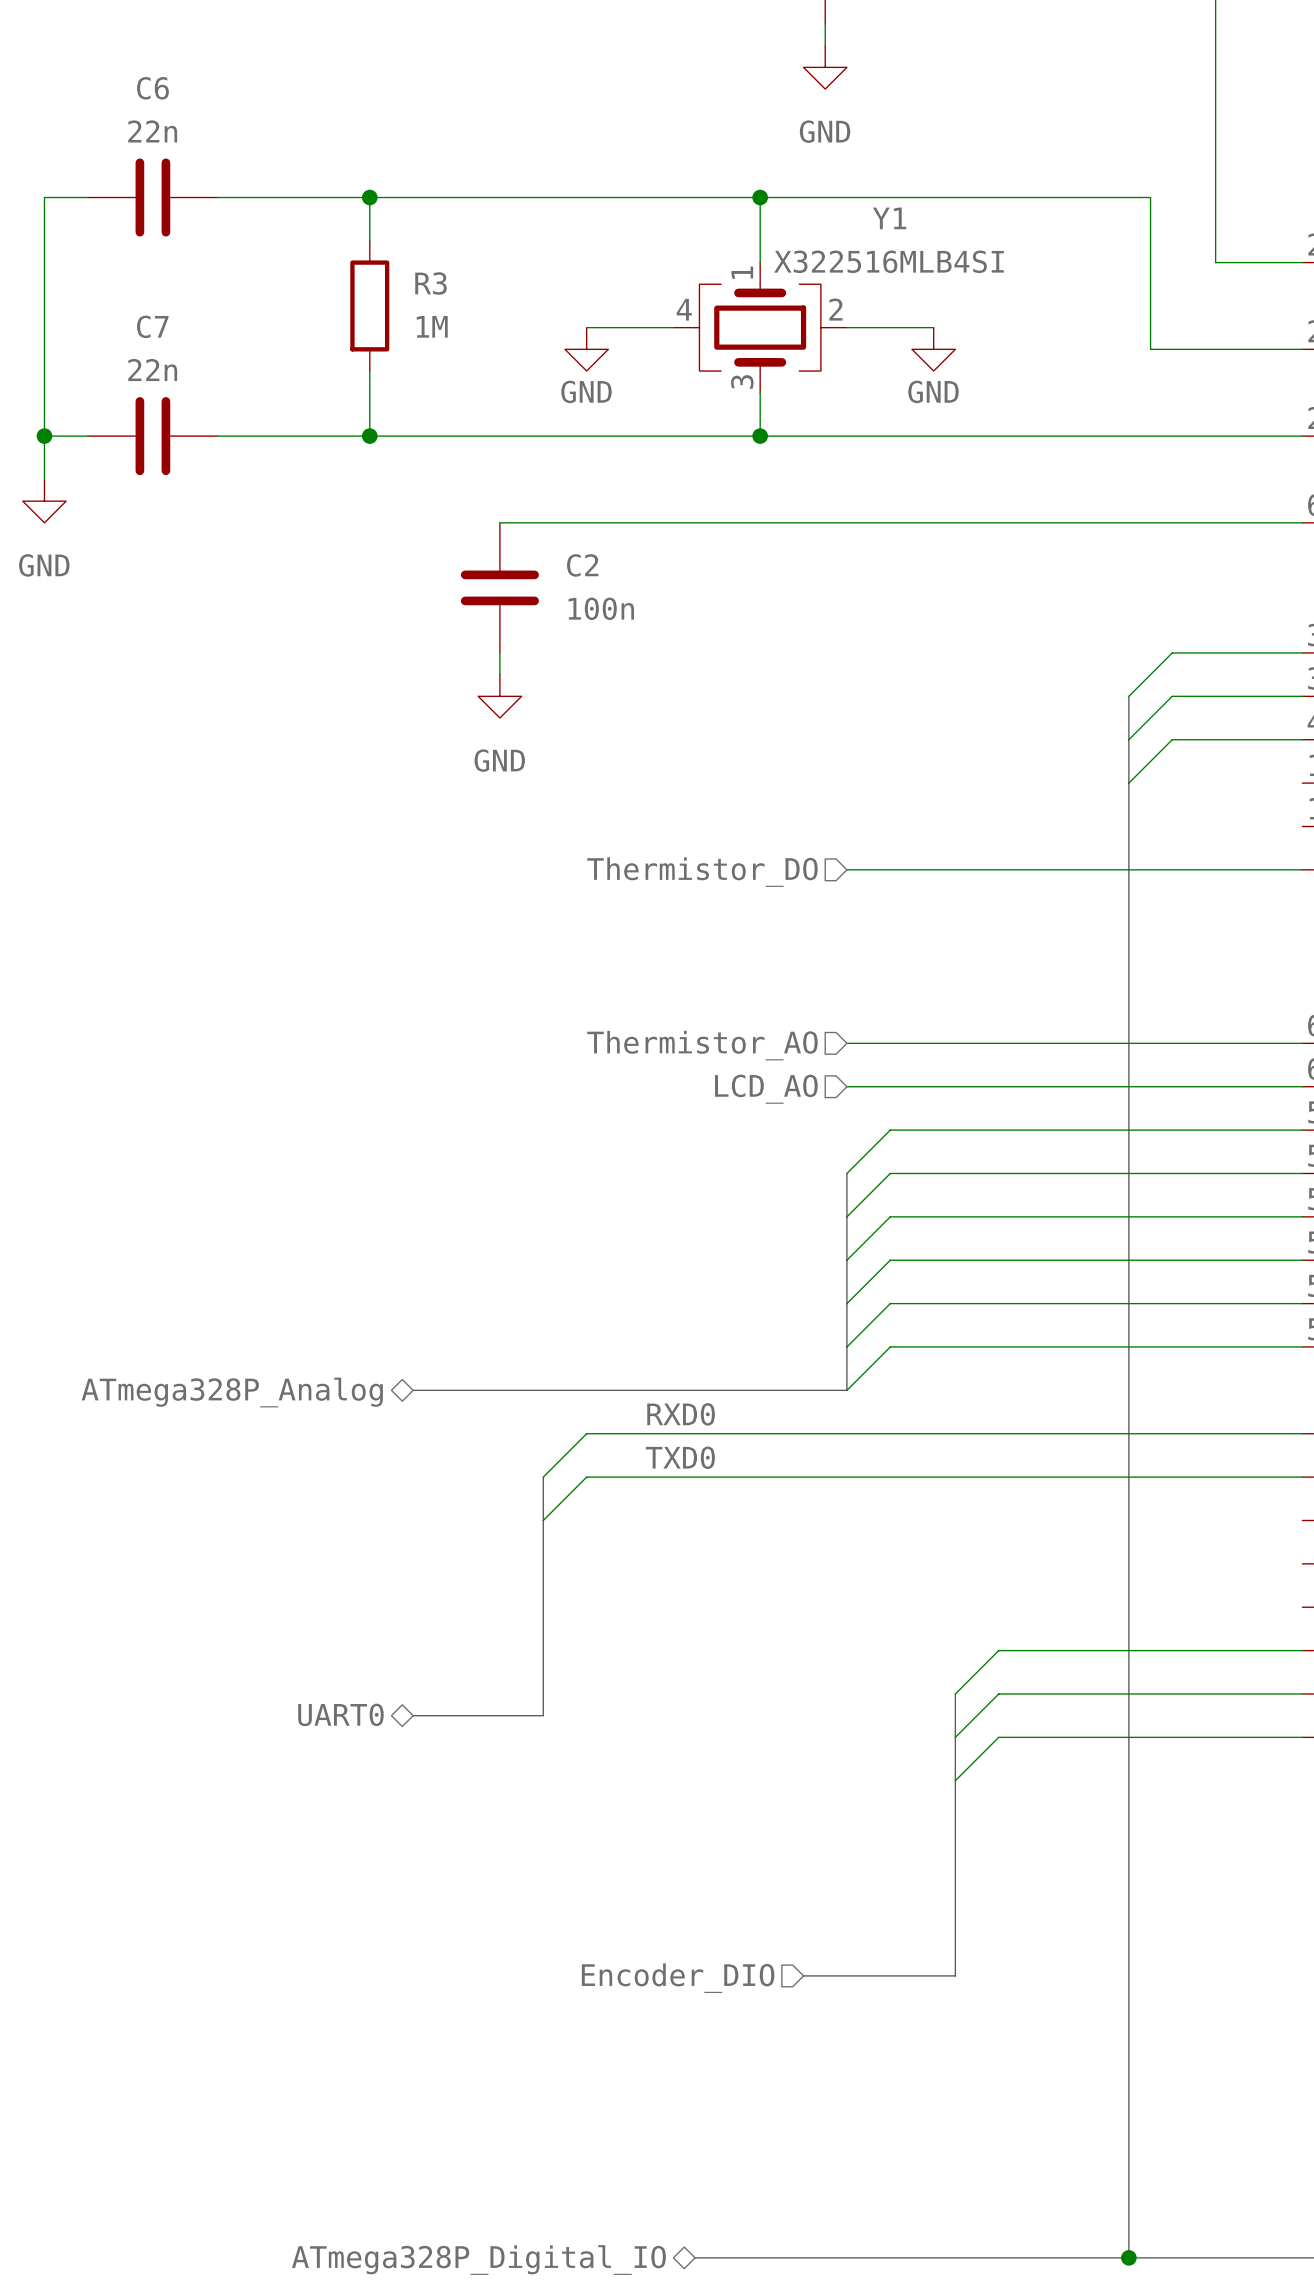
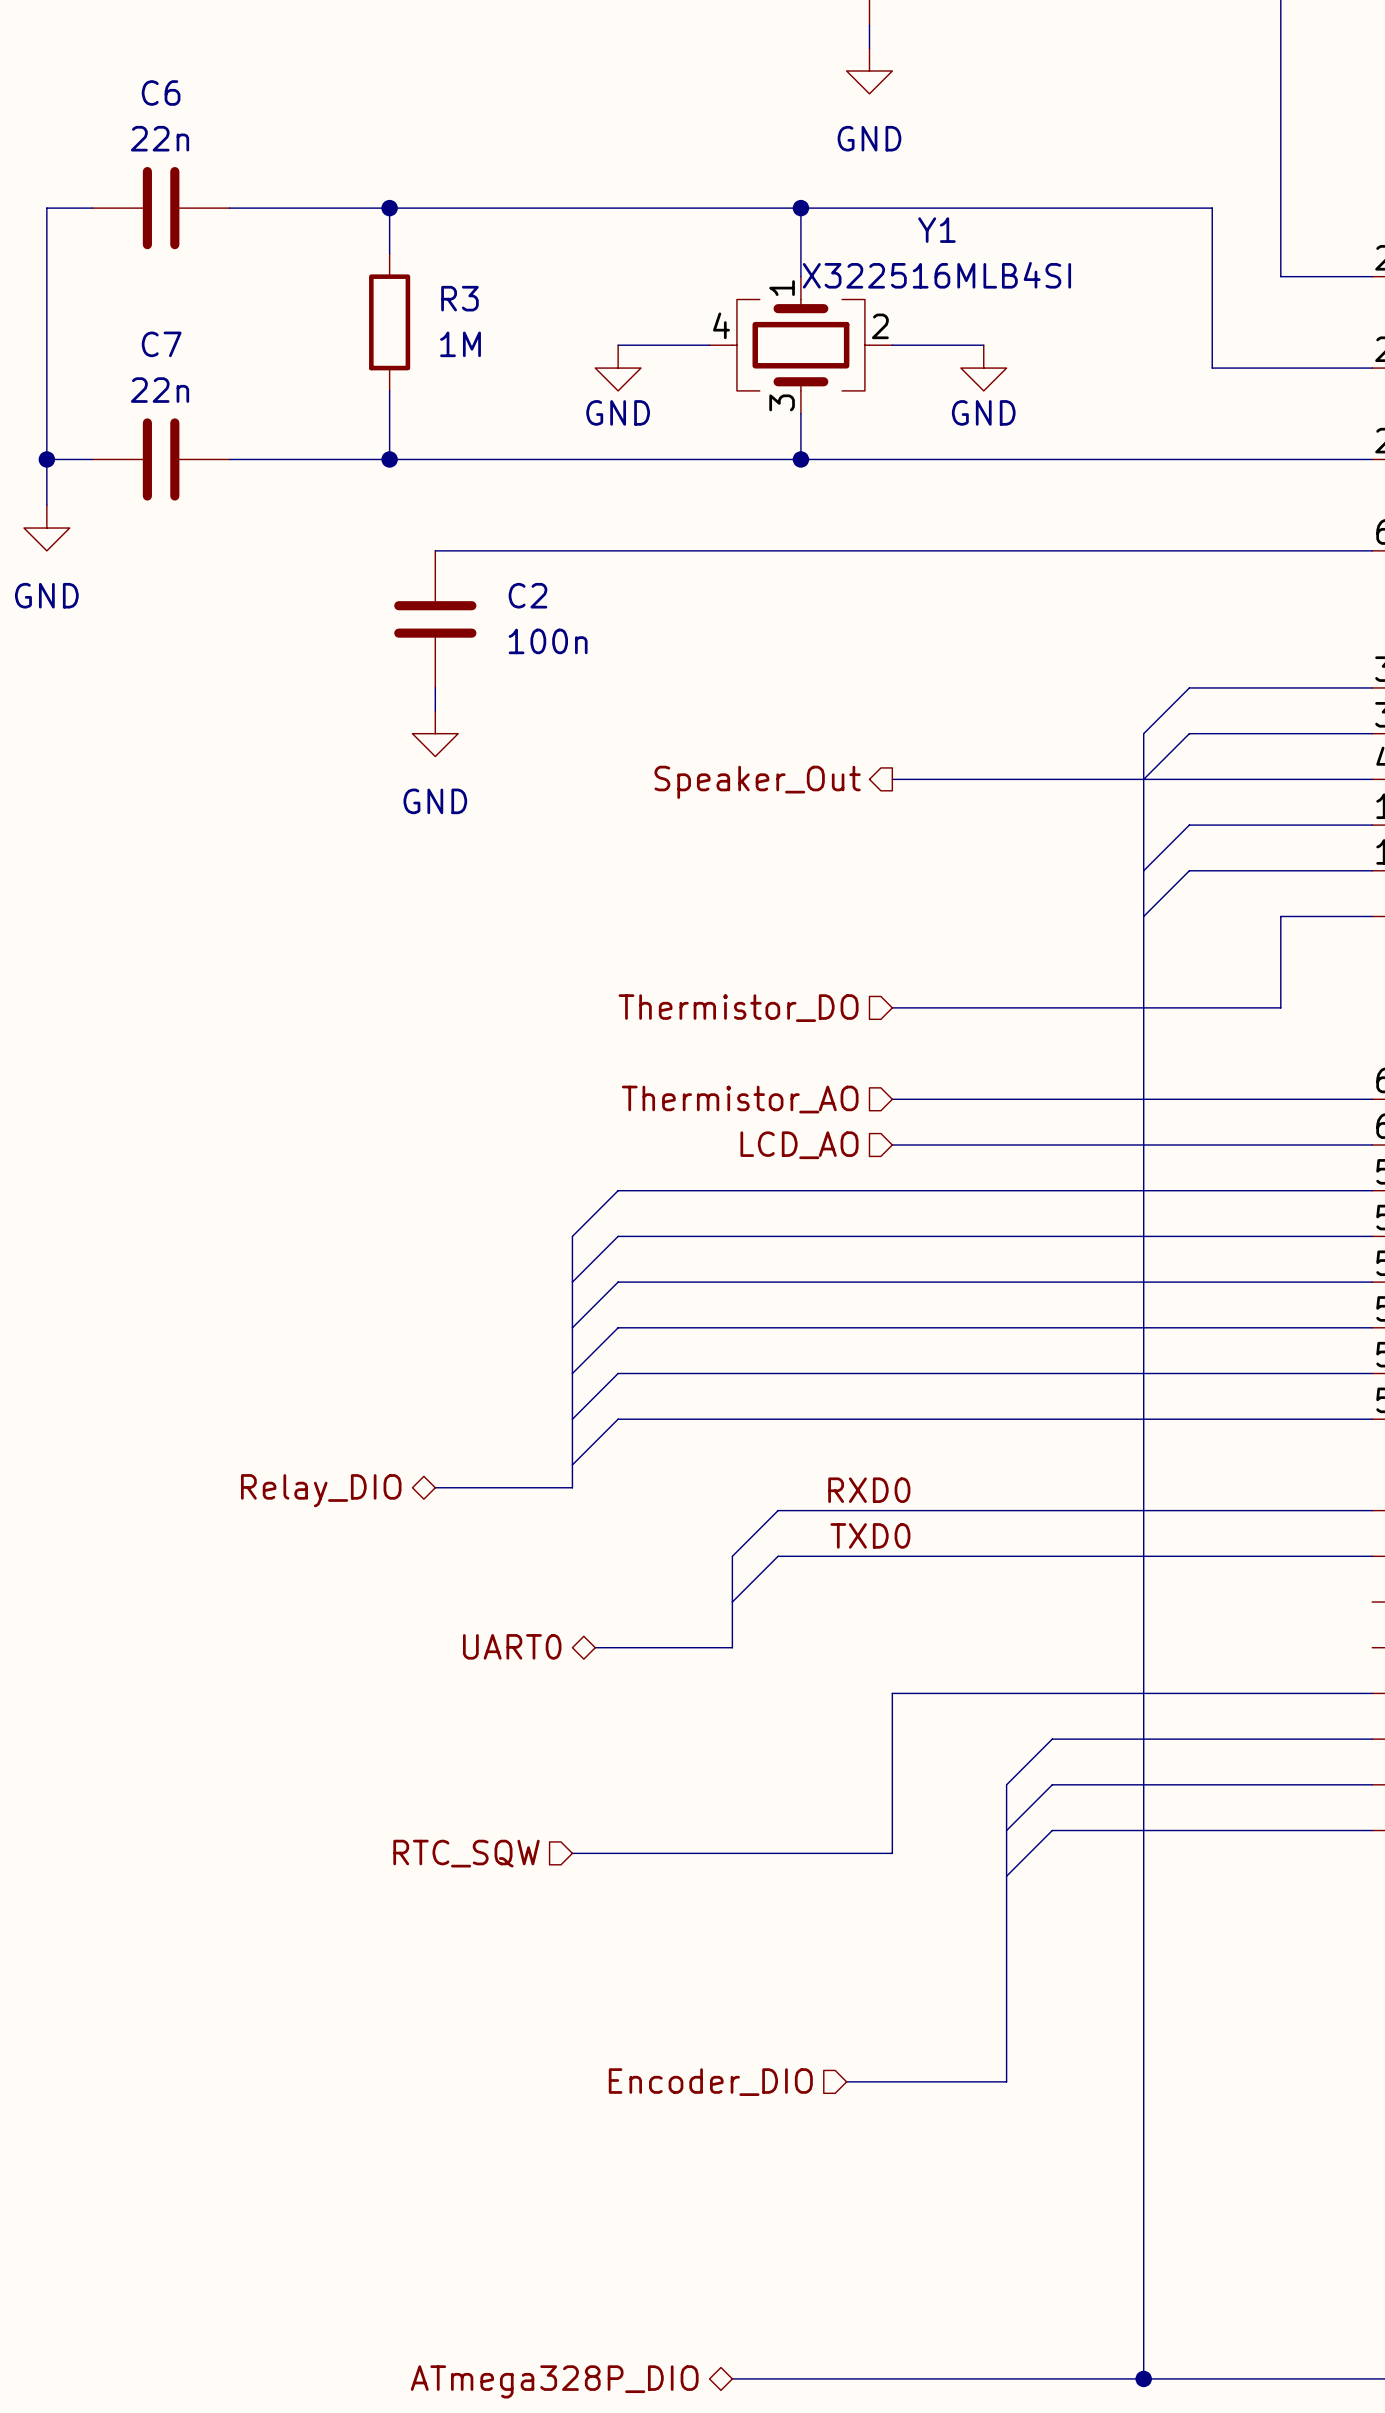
wire: none -> (435, 550) (526, 550)
C2 position: (499, 587) -> (435, 619)
wire: (499, 652) (499, 674) -> (435, 687) (435, 710)
wire: (1172, 652) (1128, 696) -> (1235, 687) (1189, 687) (1143, 733)
power symbol position: GND (499, 696) -> GND (435, 733)
bus: (1128, 696) (1128, 2257) -> (1143, 733) (1143, 2378)
wire: (1172, 696) (1128, 739) -> (1235, 733) (1189, 733) (1143, 779)
wire: (1172, 739) (1128, 783) -> (1235, 779) (892, 779)
hierarchical label: none -> Speaker_Out (757, 782)
wire: none -> (1372, 825) (1189, 825) (1143, 870)
wire: none -> (1372, 870) (1189, 870) (1143, 916)
wire: (846, 869) (1215, 869) -> (892, 1007) (1280, 1007) (1280, 916)
hierarchical label position: Thermistor_DO (702, 872) -> Thermistor_DO (738, 1008)
wire: (890, 1130) (846, 1173) -> (938, 1190) (618, 1190) (572, 1236)
bus: (846, 1173) (846, 1390) (413, 1390) -> none
wire: (890, 1173) (846, 1216) -> (938, 1236) (618, 1236) (572, 1282)
wire: (890, 1216) (846, 1260) -> (938, 1282) (618, 1282) (572, 1327)
wire: (890, 1260) (846, 1303) -> (938, 1327) (618, 1327) (572, 1373)
wire: (890, 1303) (846, 1346) -> (938, 1373) (618, 1373) (572, 1419)
wire: (890, 1346) (846, 1390) -> (938, 1419) (618, 1419) (572, 1464)
hierarchical label: ATmega328P_Analog (232, 1392) -> none
hierarchical label: none -> Relay_DIO (321, 1490)
label position: RXD0 (681, 1414) -> RXD0 (869, 1490)
wire: (738, 1433) (586, 1433) (543, 1477) -> (778, 1510) (732, 1556)
label position: TXD0 (680, 1457) -> TXD0 (870, 1535)
bus: (543, 1477) (543, 1715) (413, 1715) -> (572, 1236) (572, 1487) (435, 1487)
bus: none -> (732, 1556) (732, 1647) (595, 1647)
wire: (738, 1477) (586, 1477) (543, 1520) -> (778, 1556) (732, 1602)
wire: none -> (1372, 1693) (892, 1693) (892, 1853) (572, 1853)
hierarchical label position: UART0 (340, 1714) -> UART0 (512, 1646)
hierarchical label: none -> RTC_SQW (466, 1853)
junction position: (1128, 2257) -> (1143, 2378)
hierarchical label: ATmega328P_Digital_IO (478, 2260) -> ATmega328P_DIO (554, 2381)

